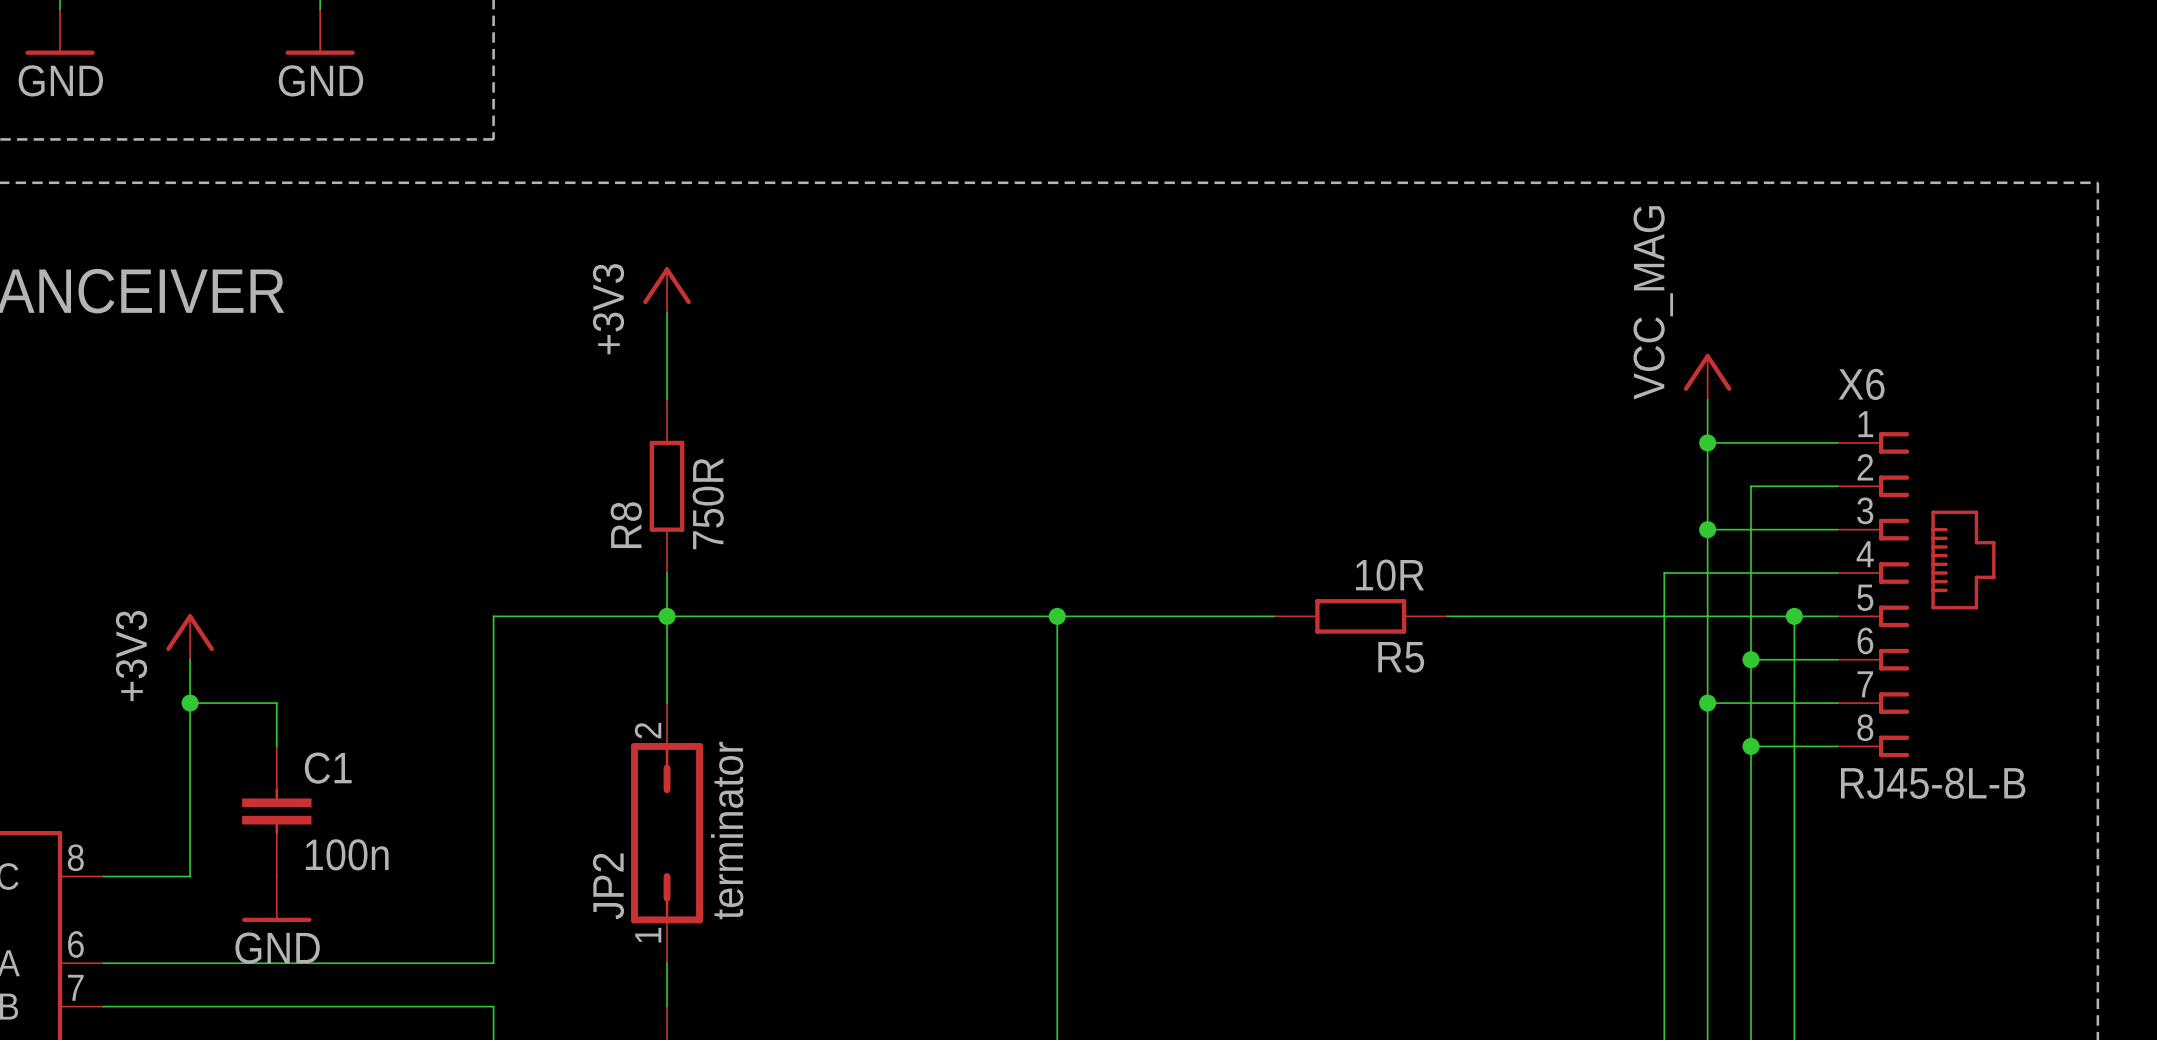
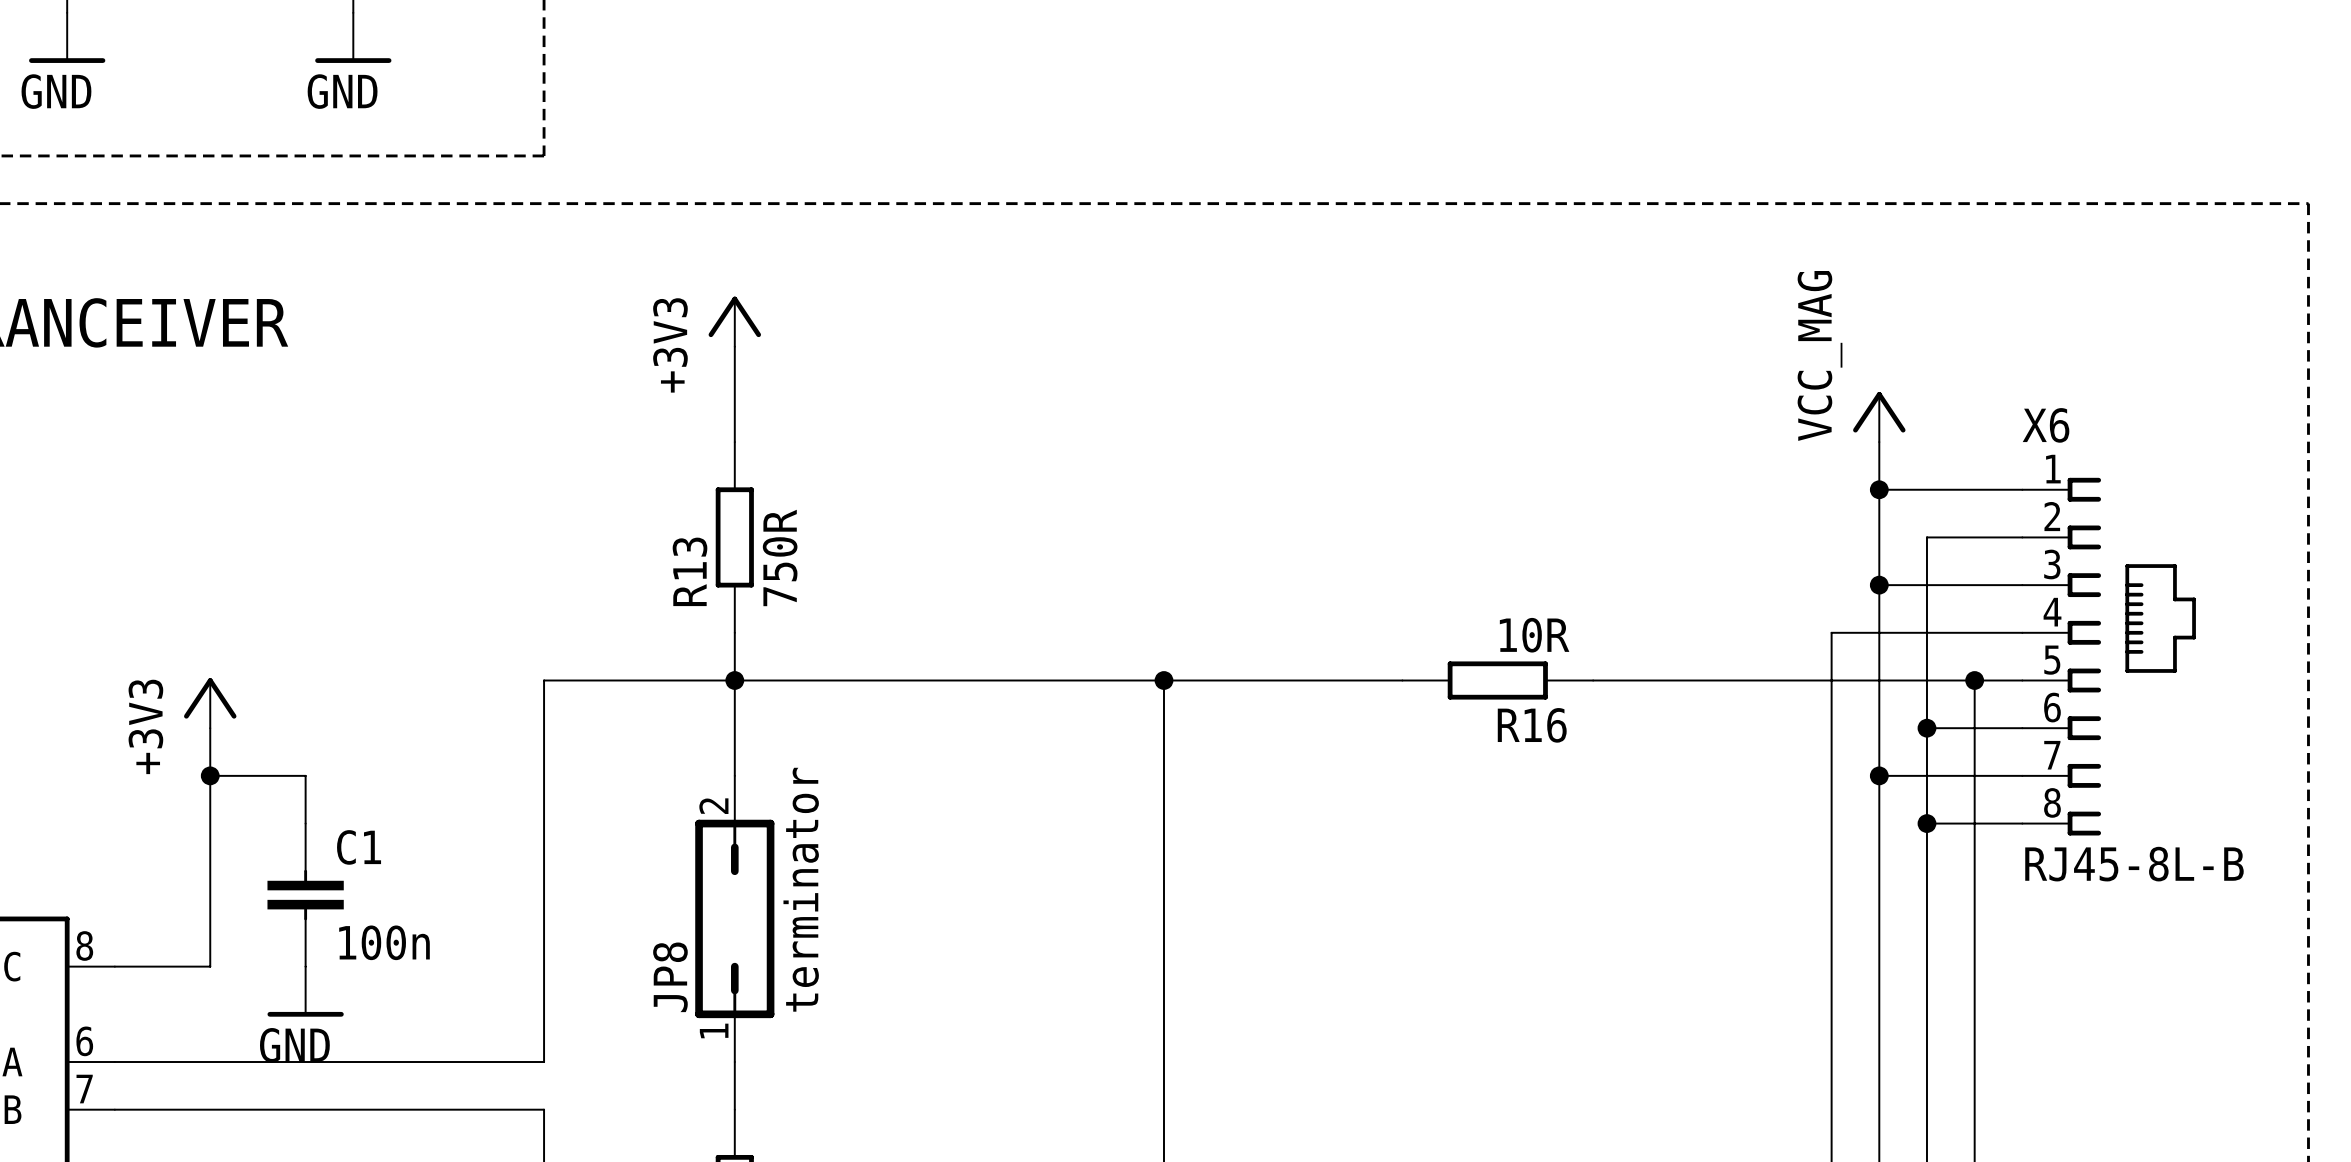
R8 name: R8 (626, 525) -> R13 (690, 571)
R5 name: R5 (1401, 657) -> R16 (1532, 725)
JP2 name: JP2 (608, 886) -> JP8 (670, 977)

